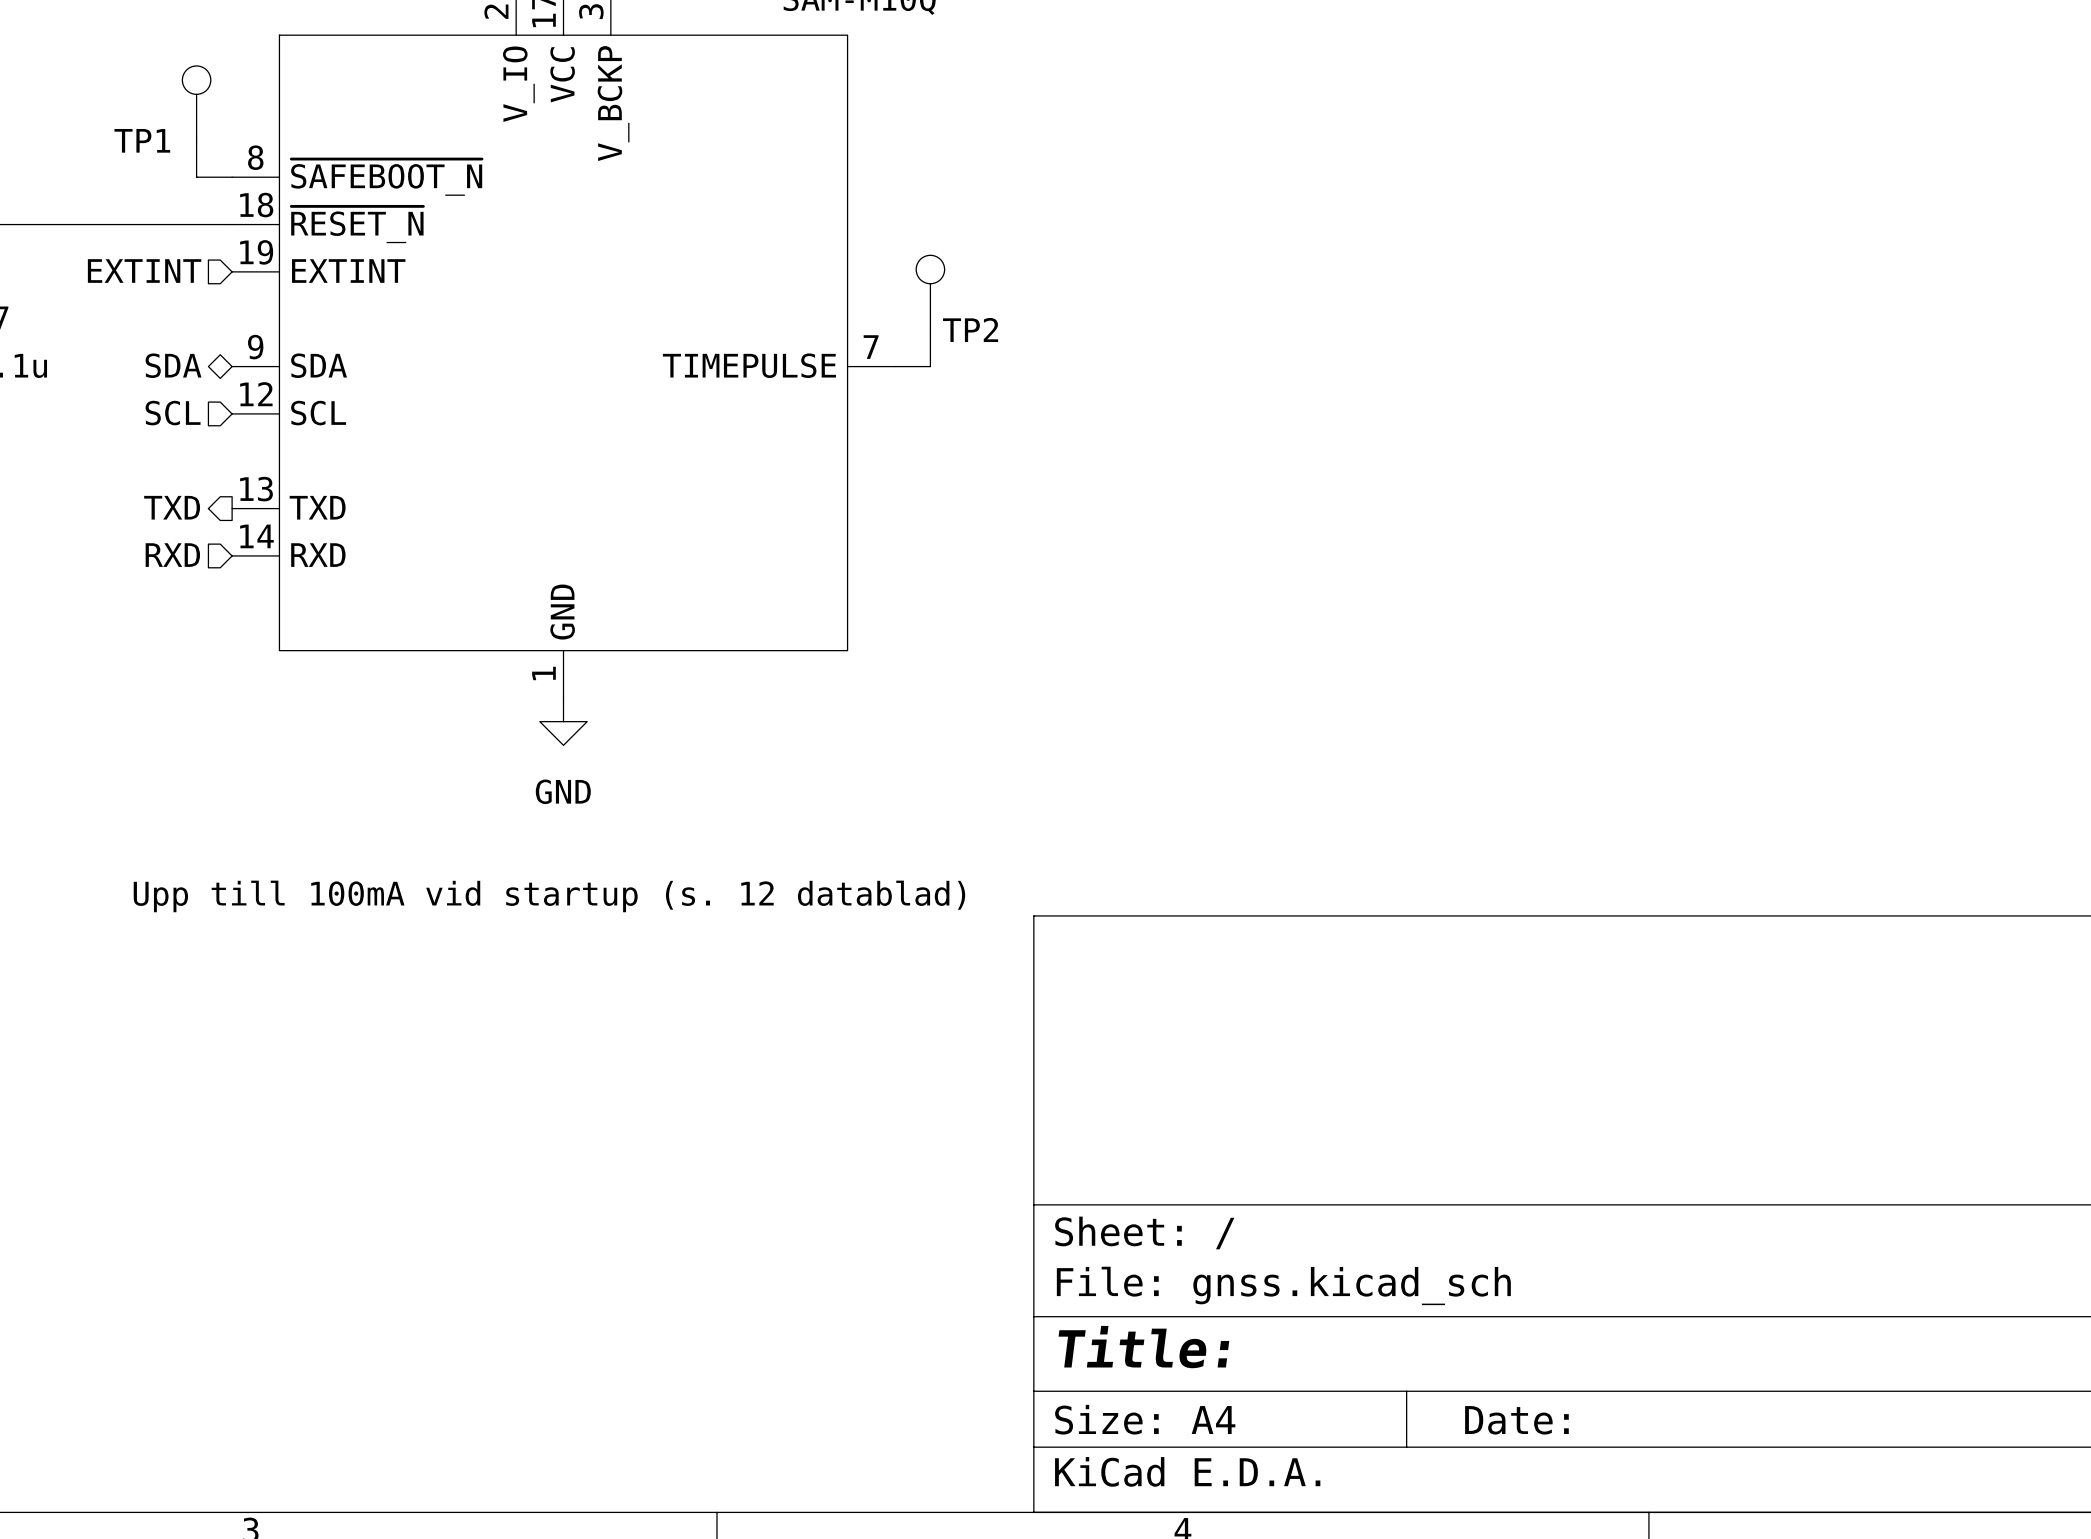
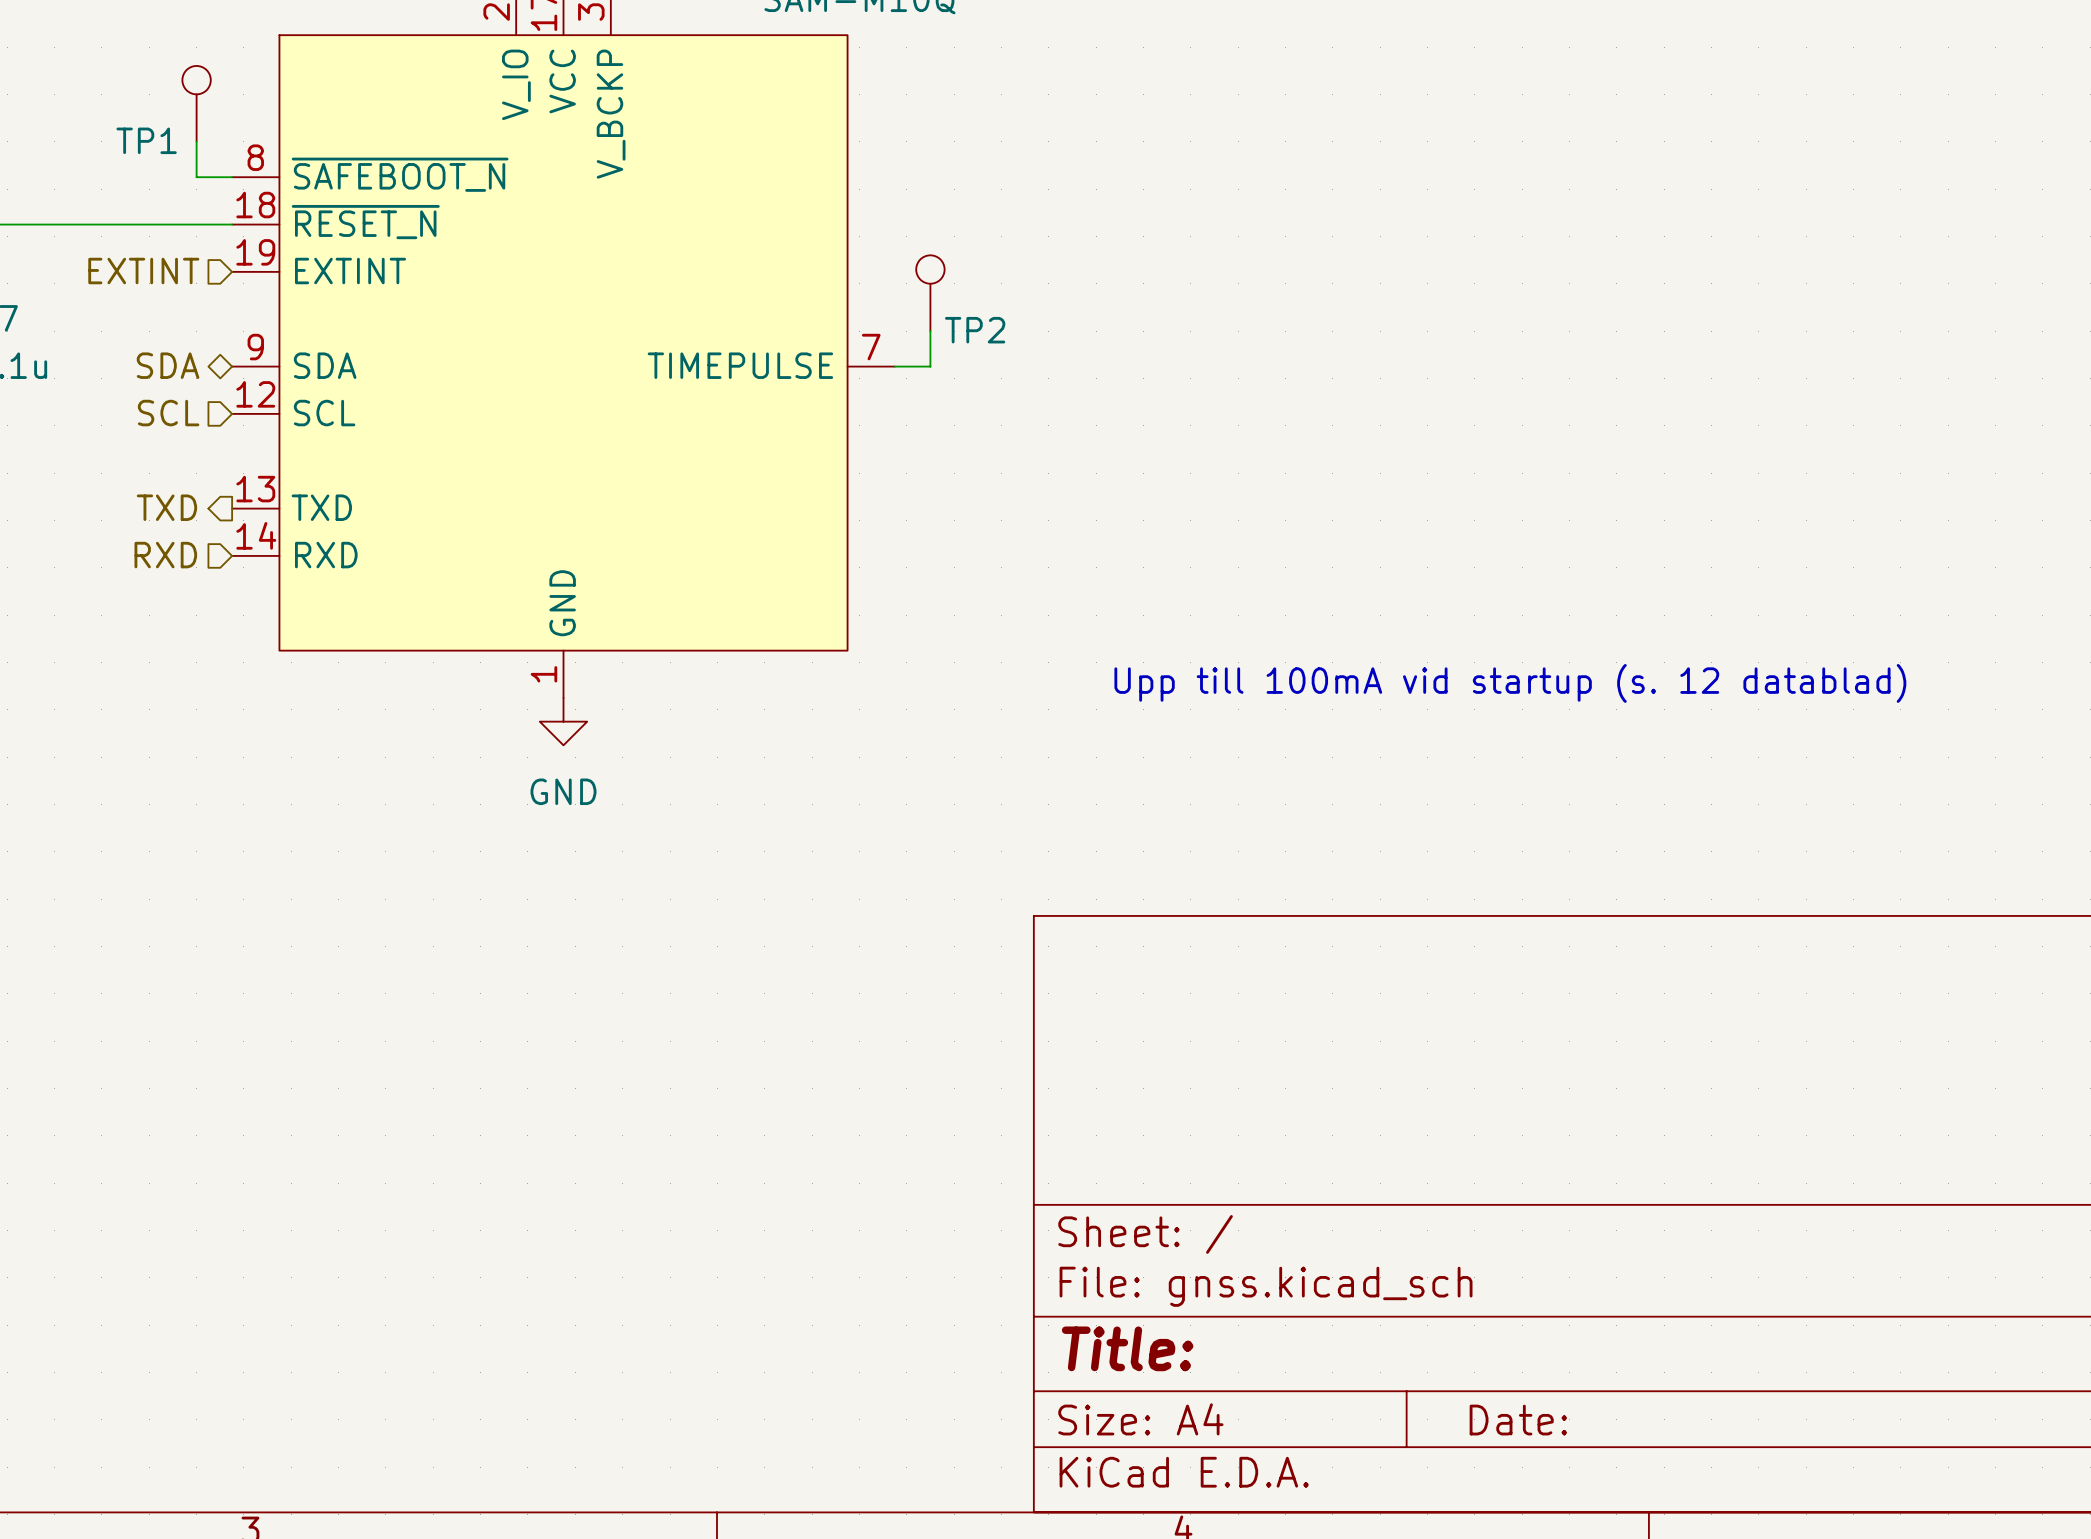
text: none -> Upp till 100mA vid startup (s. 12 datablad) (1510, 683)
text: Upp till 100mA vid startup (s. 12 datablad) (549, 896) -> none

